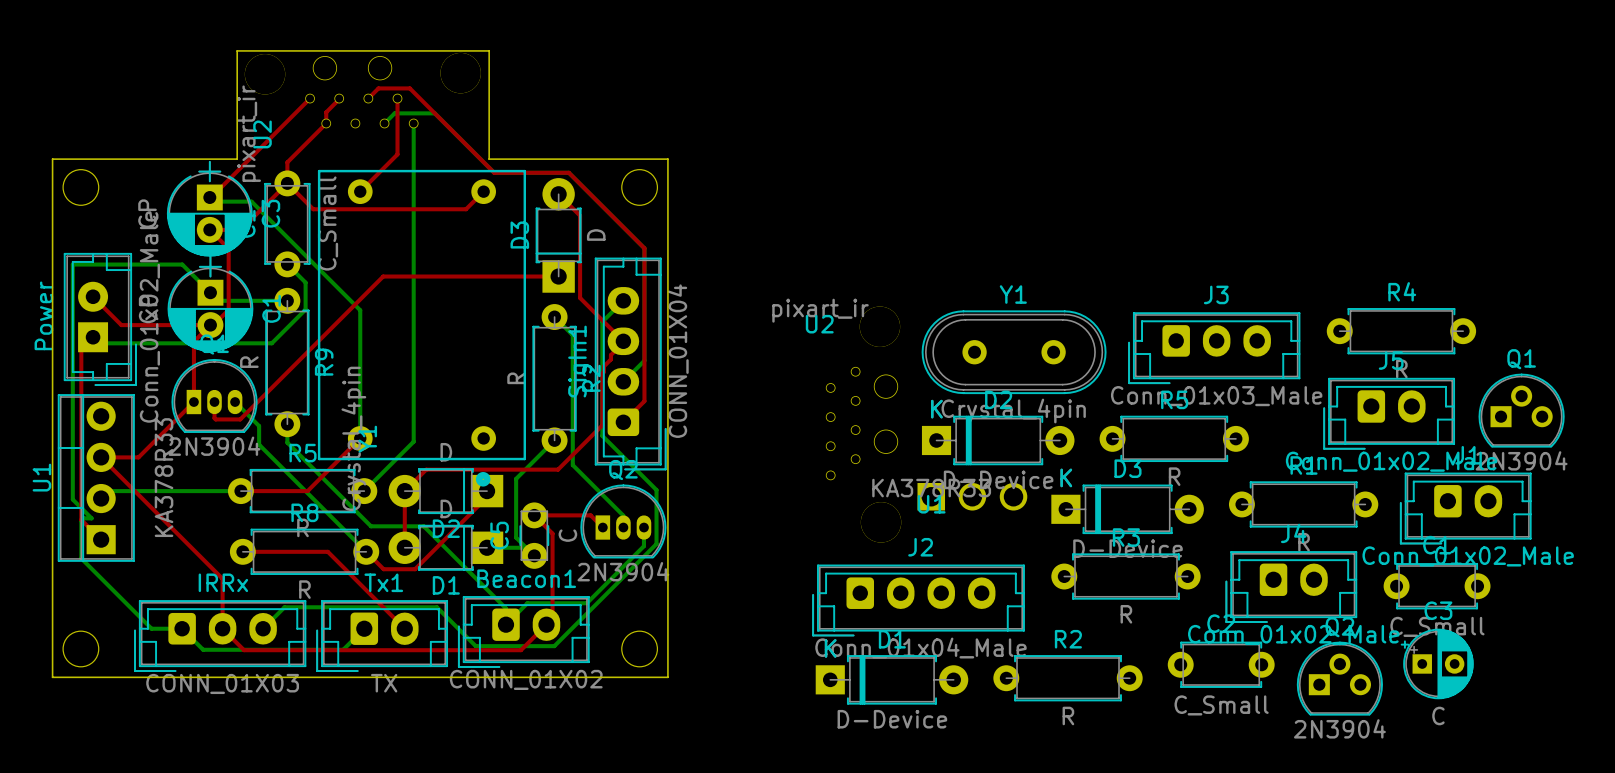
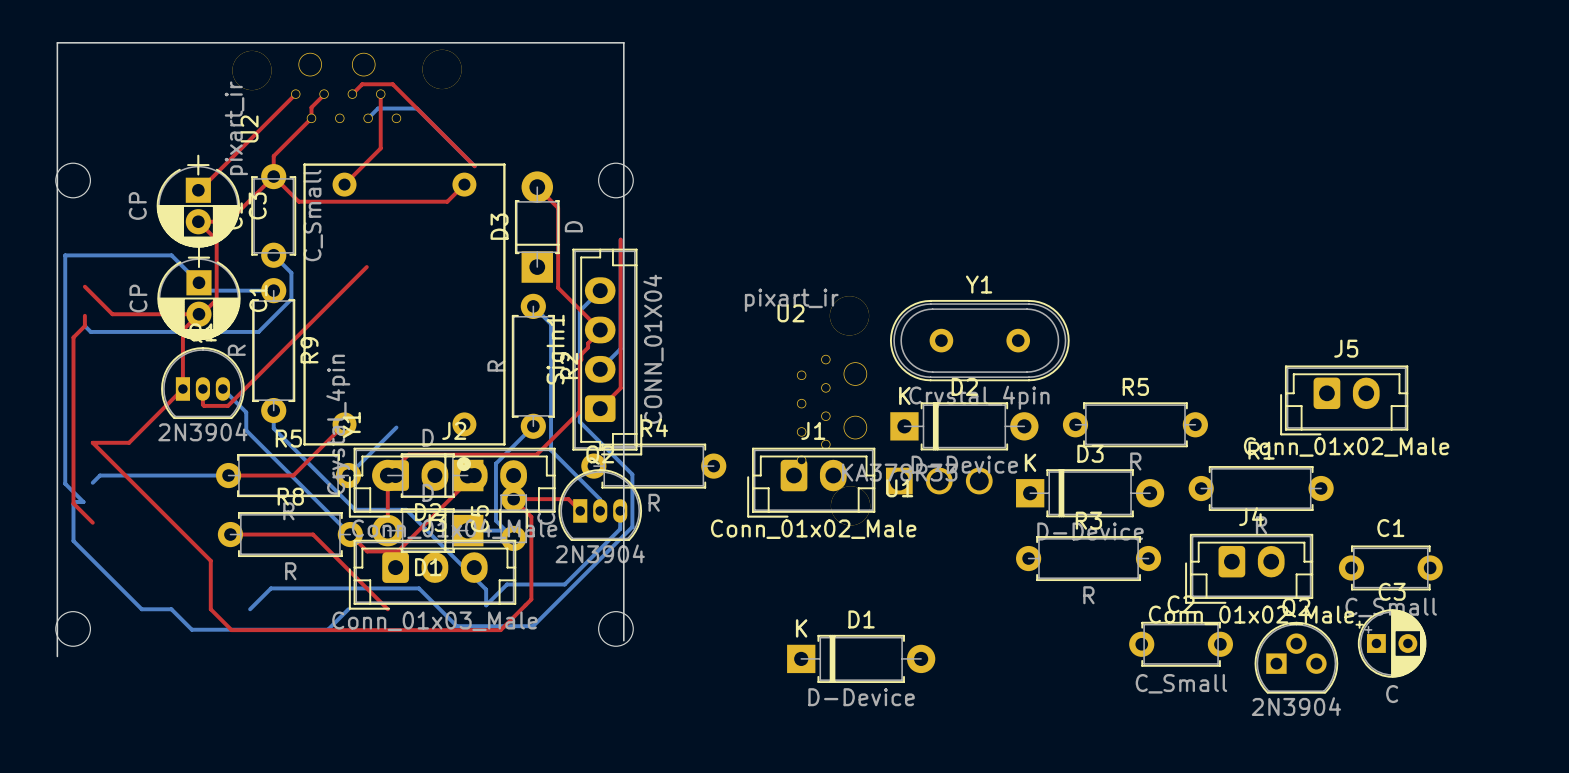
board edge: (237, 50) (489, 50) (489, 159) (667, 159) (667, 677) (52, 677) (52, 159) (237, 159) (237, 50) -> none
bottom track: (413, 123) (413, 441) -> none
top track: (494, 172) (568, 172) (644, 248) -> none
bottom track: (213, 201) (251, 201) (360, 310) (360, 438) -> none
top track: (383, 276) (558, 276) -> none
Power: Conn_01x02_Male (100, 319) -> none
R4 position: (1401, 331) -> (653, 466)
J3 position: (1214, 348) -> (432, 574)
Q1: 2N3904 (1521, 410) -> none
U1: KA378R33 (96, 477) -> none
J1 position: (1465, 508) -> (811, 482)
J2 position: (918, 600) -> (452, 482)
Beacon1: CONN_01X02 (523, 631) -> none
IRRx: CONN_01X03 (220, 636) -> none
Tx1: TX (382, 636) -> none
board edge: none -> (623, 640) (623, 42) (57, 42) (57, 656)
R2: R (1068, 678) -> none

